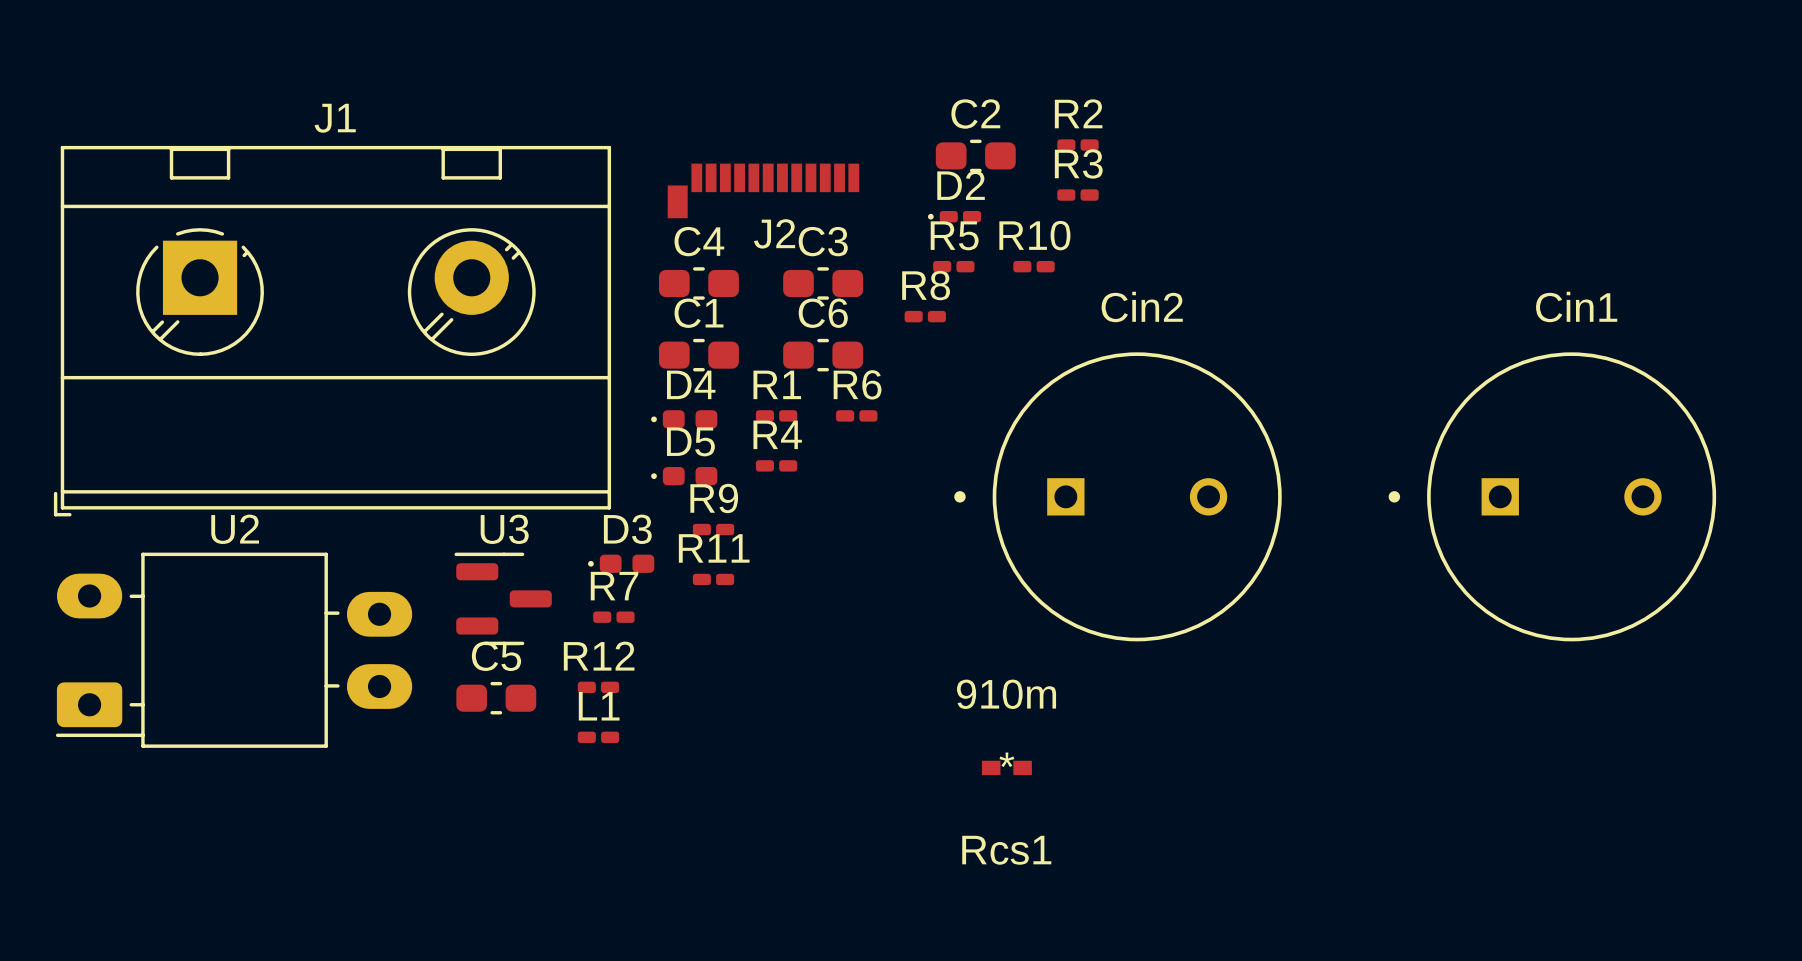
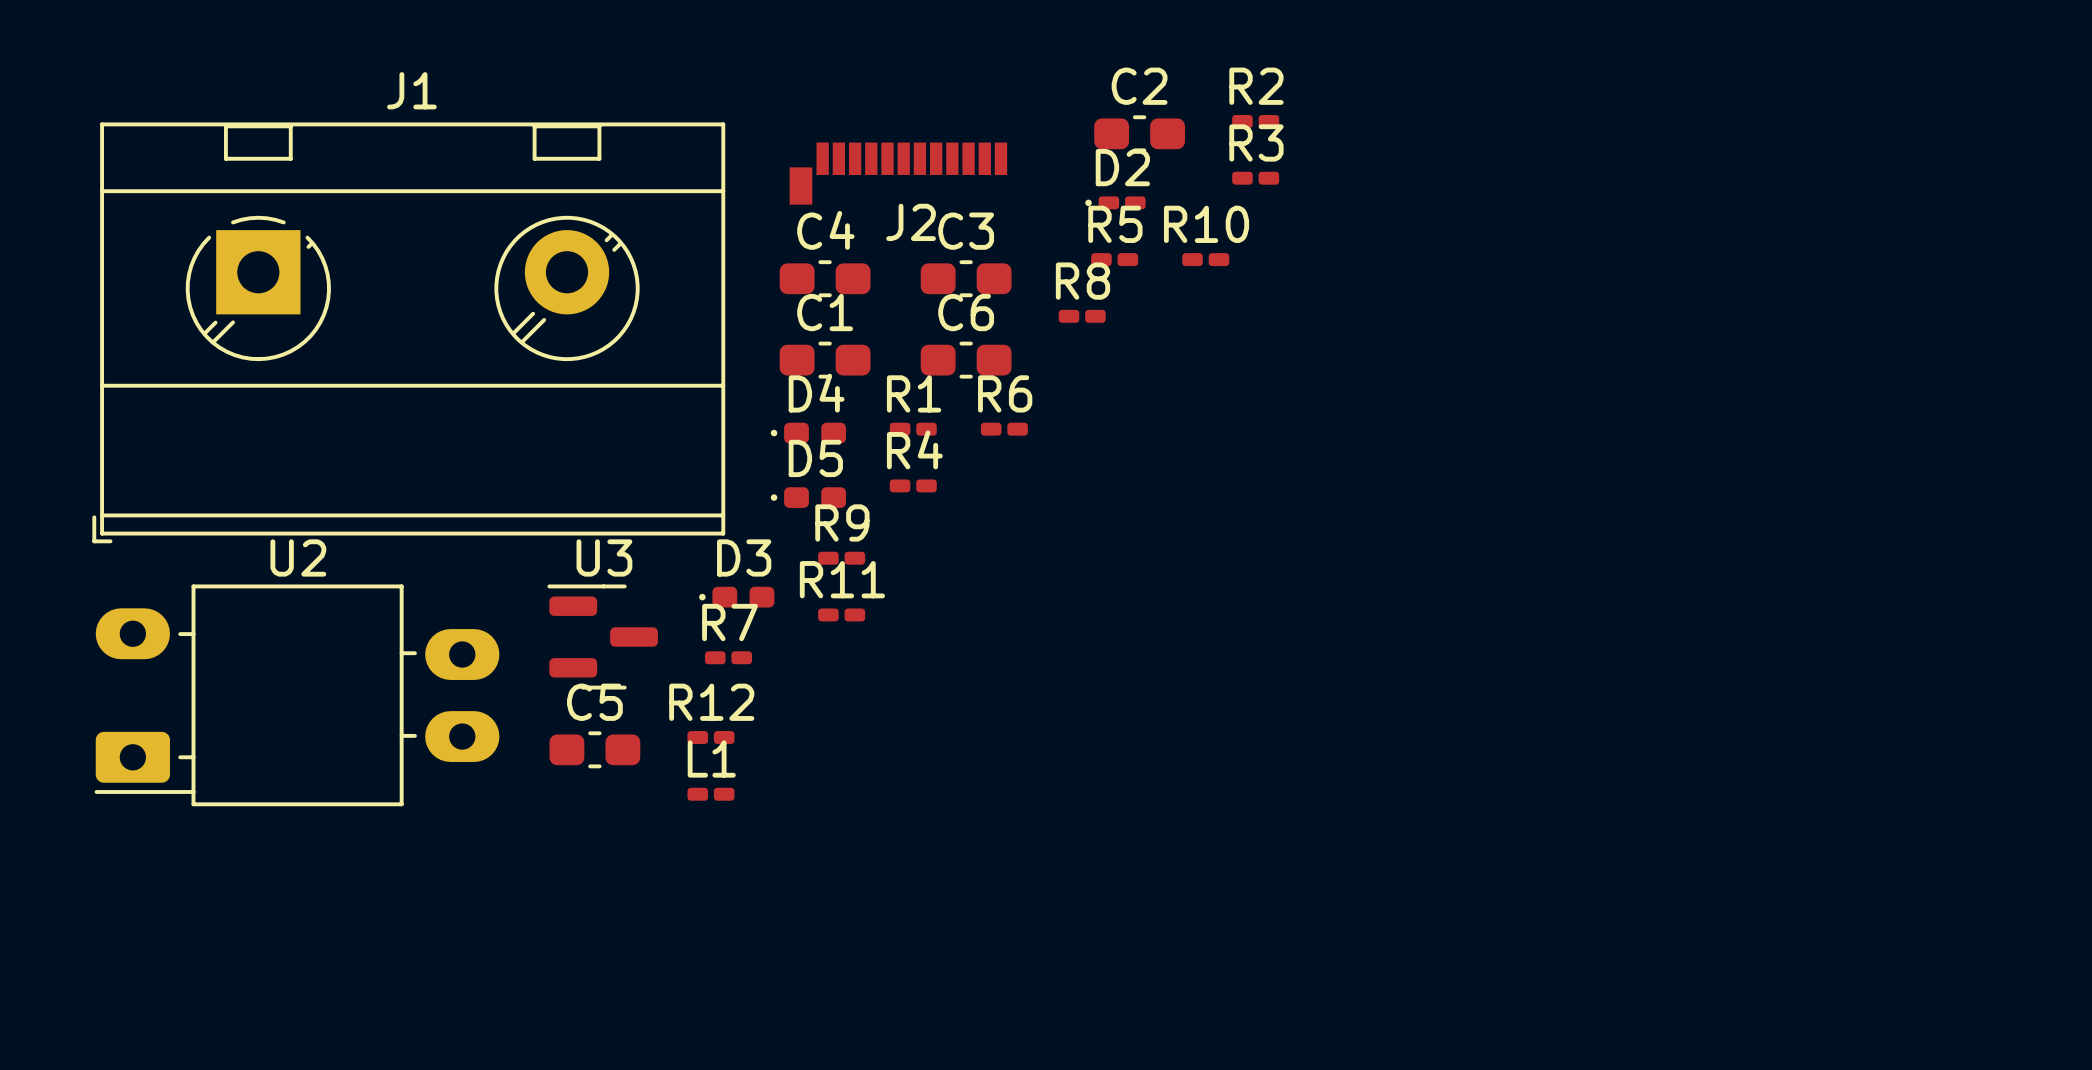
Cin2: (1117, 496) -> none
Cin1: (1552, 496) -> none
Rcs1: 910m (1006, 767) -> none

